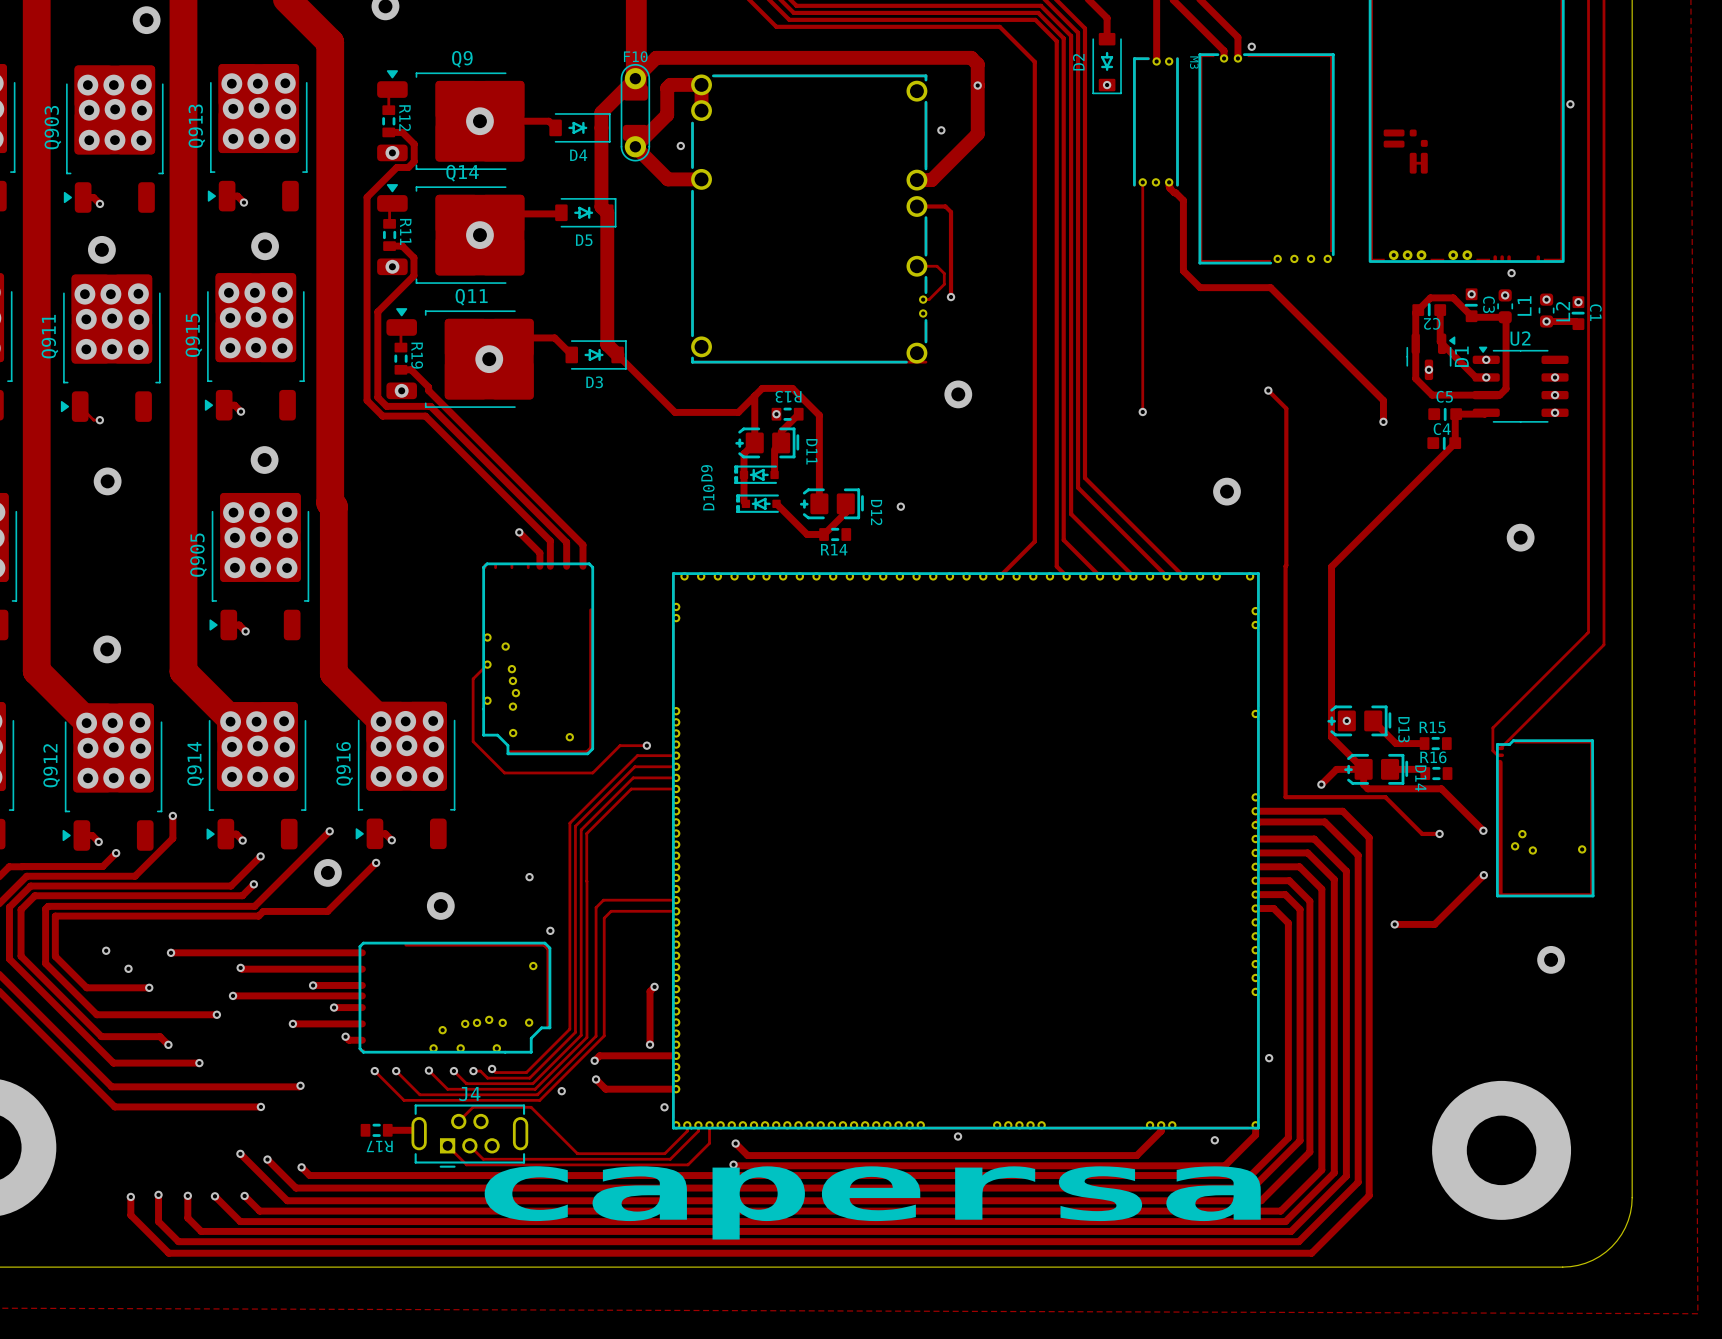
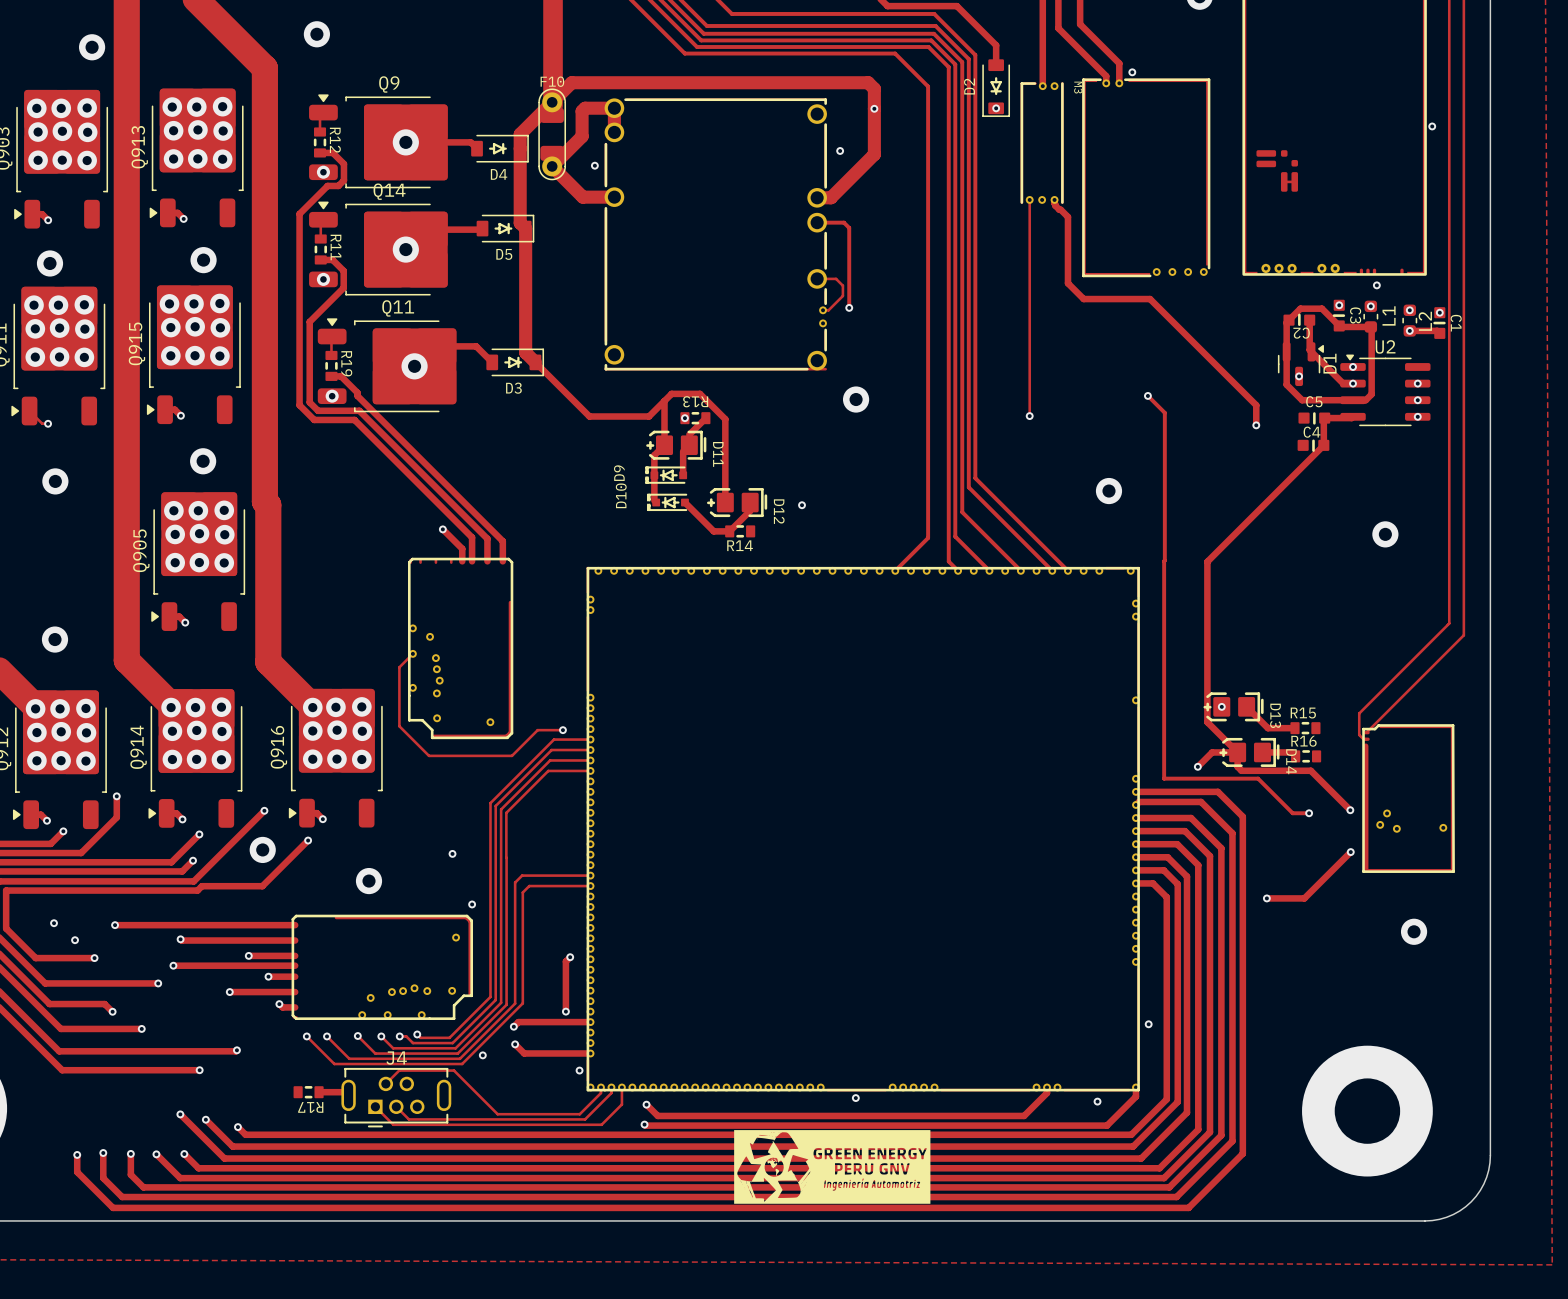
drawing: none -> [734, 1130, 931, 1204]
text: capersa (872, 1202) -> none

